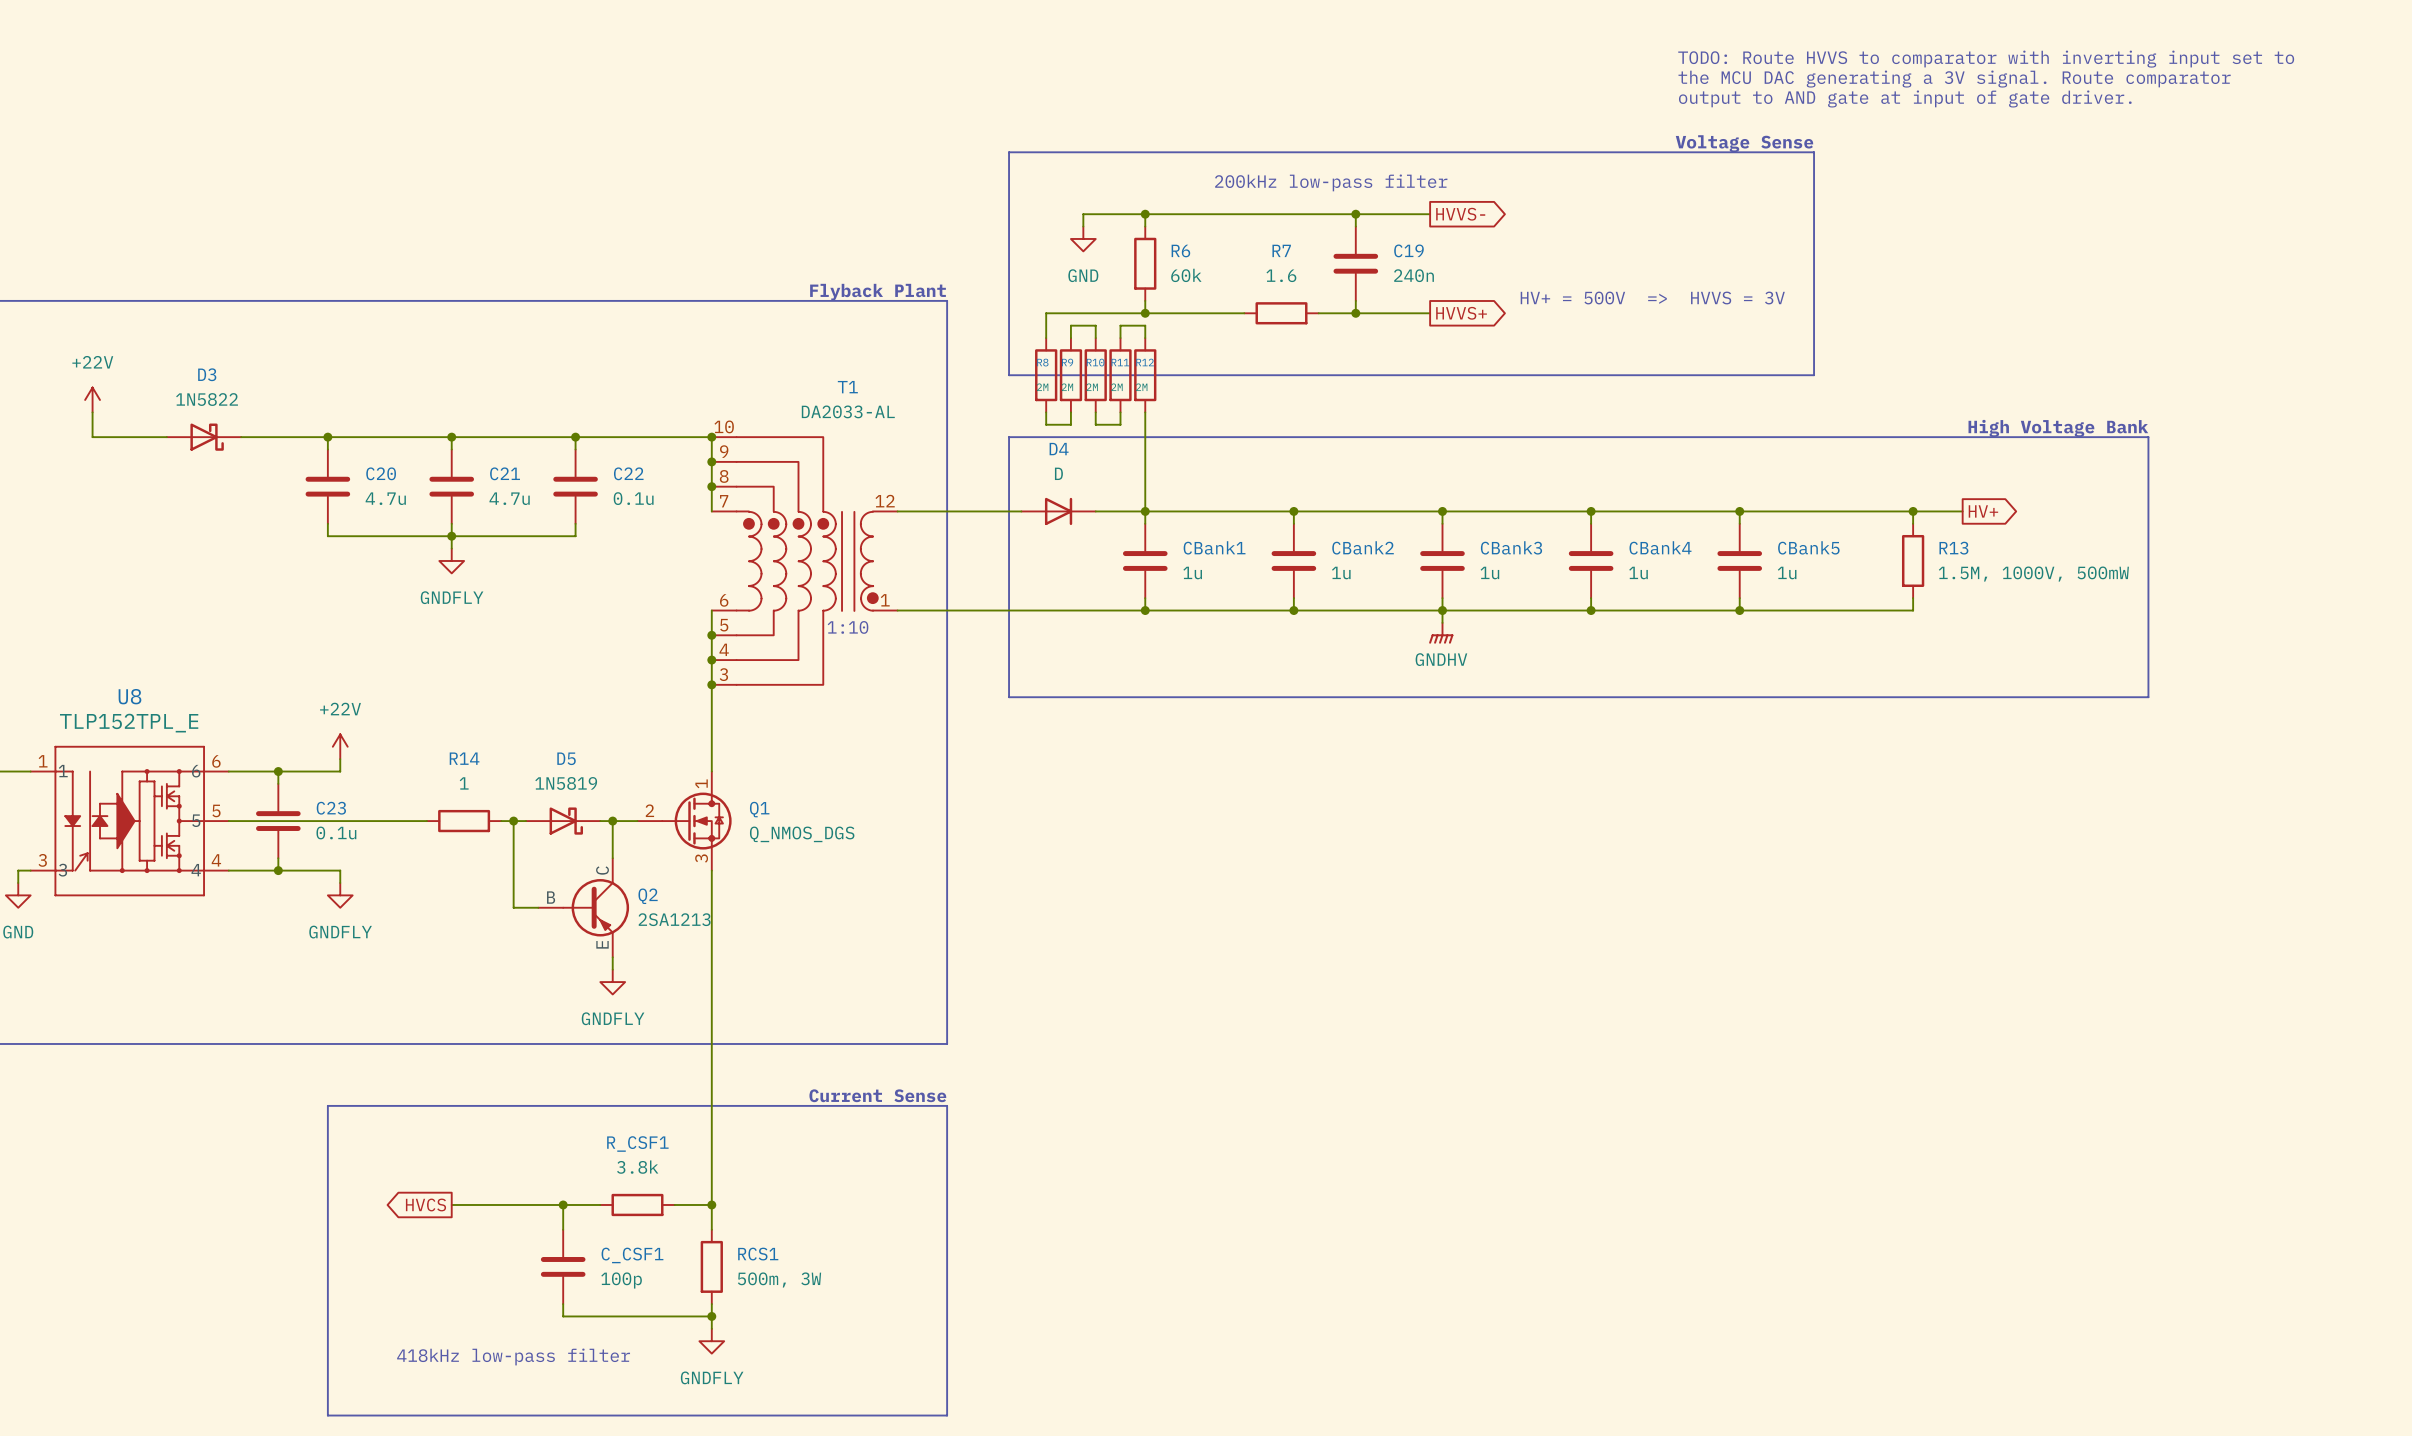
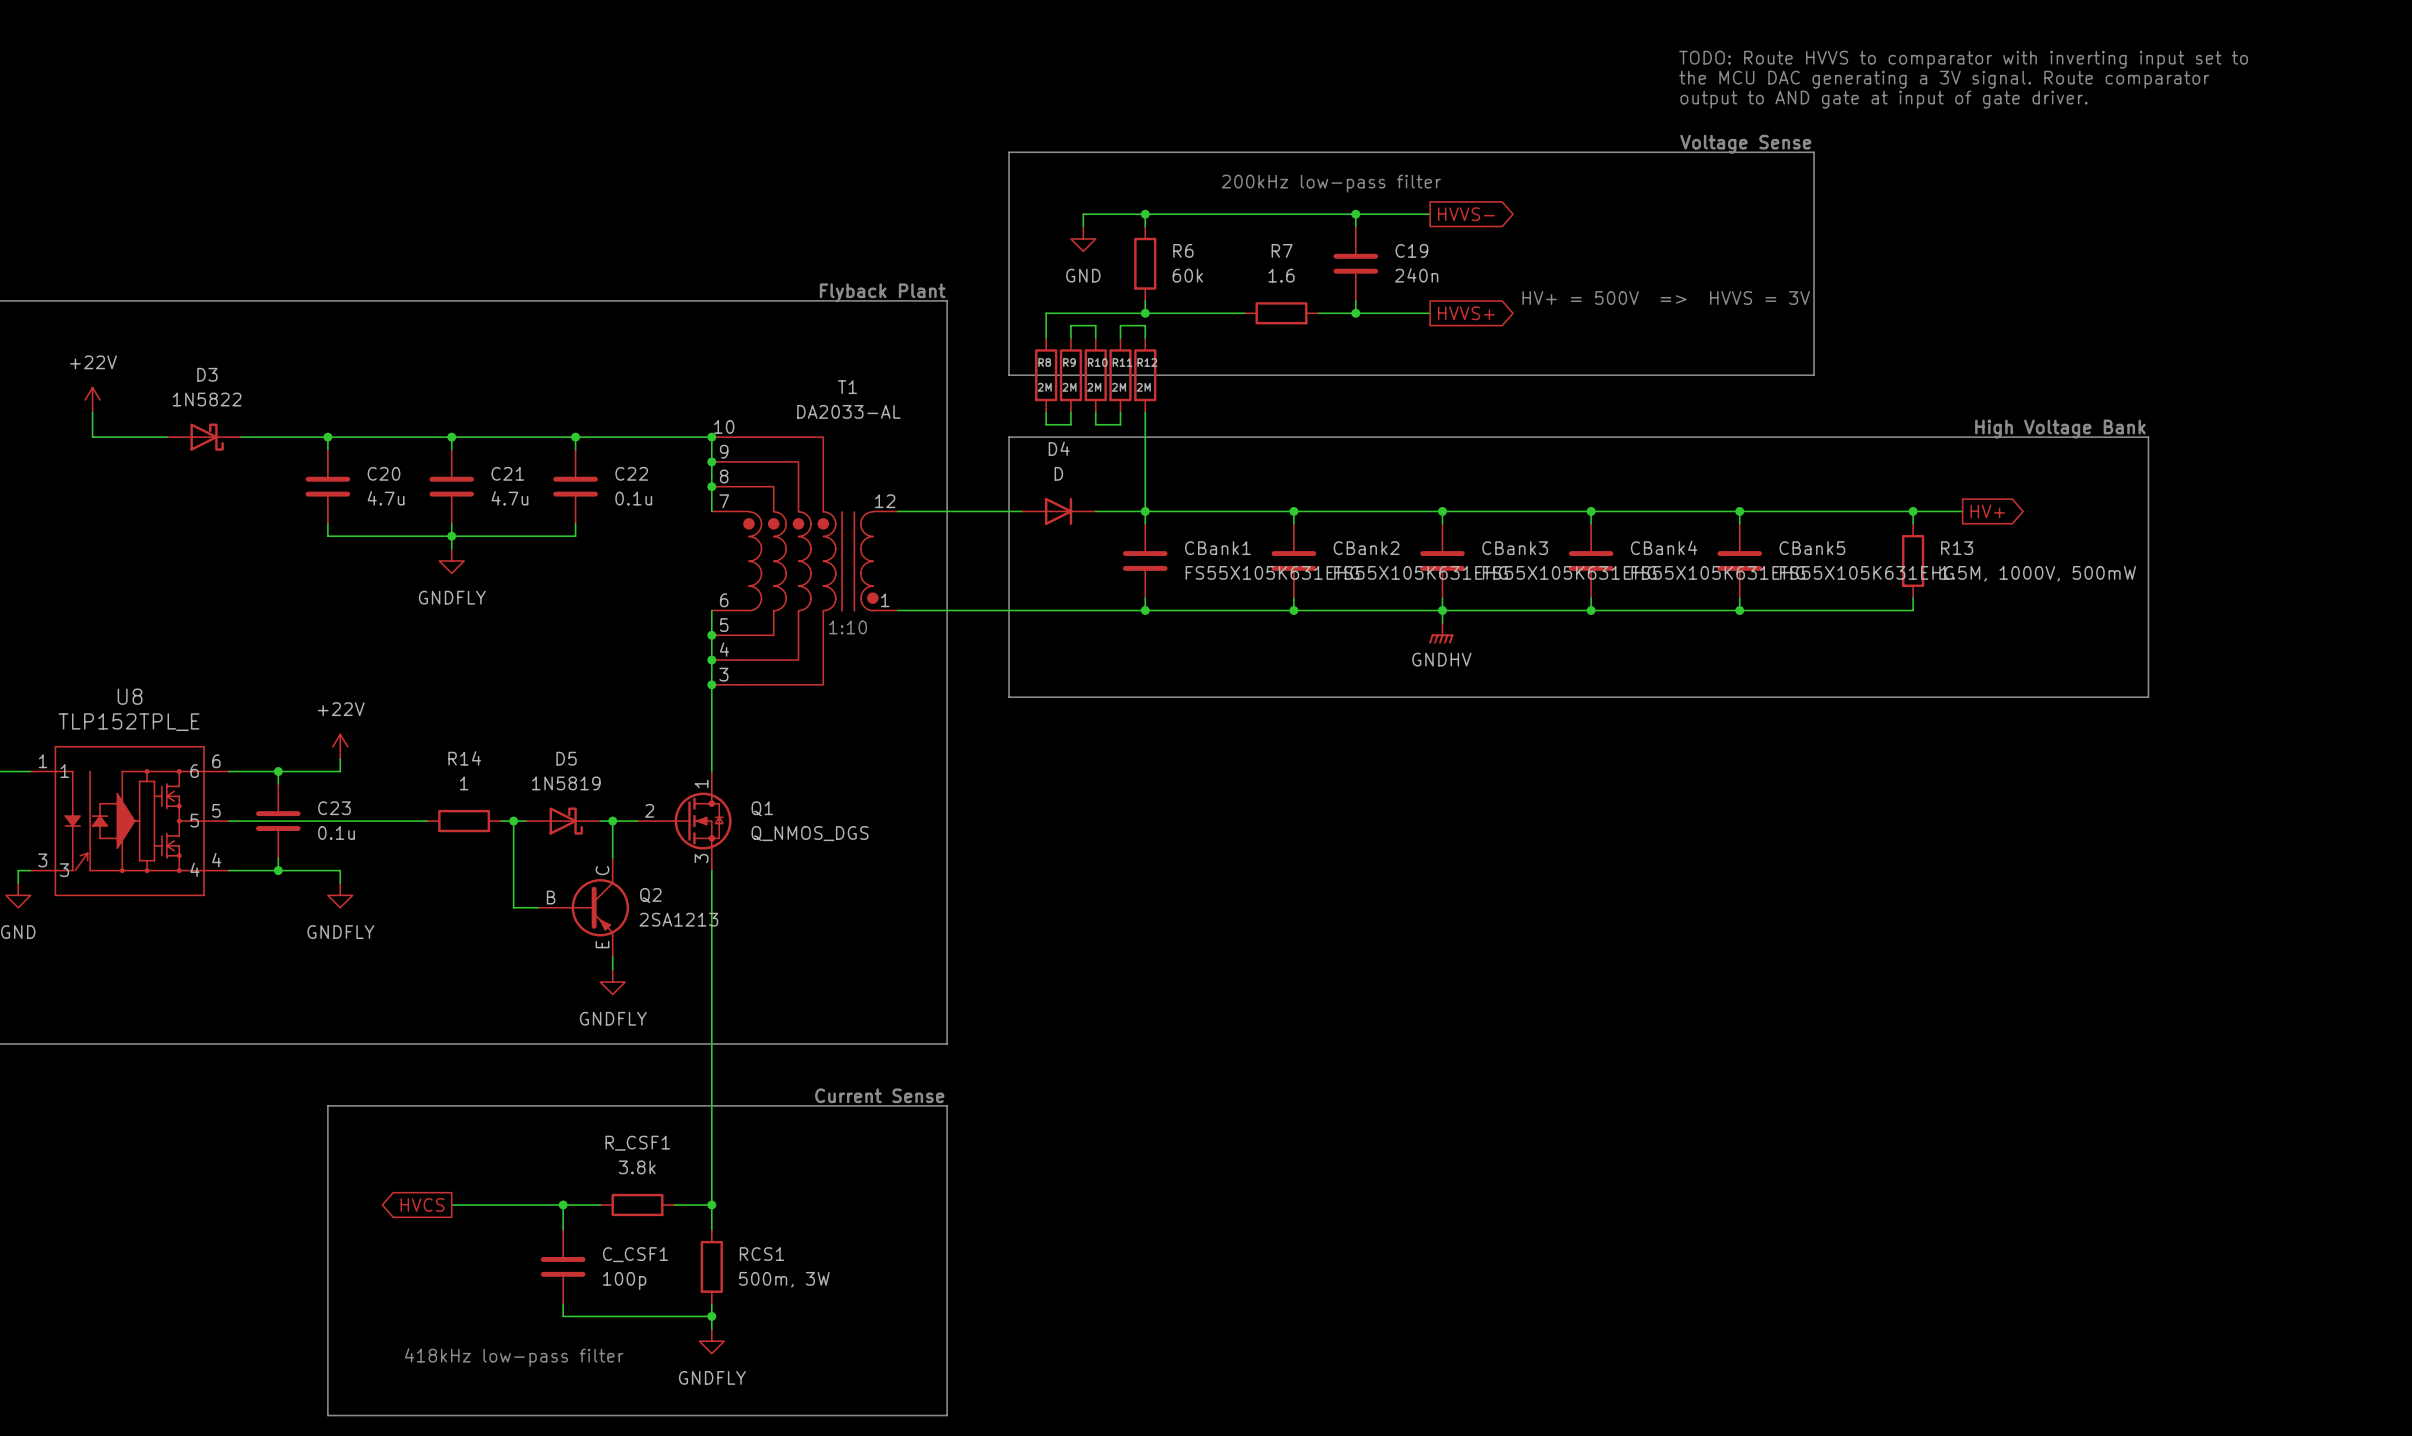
CBank1 value: 1u (1192, 573) -> FS55X105K631EHG (1272, 572)
CBank2 value: 1u (1341, 573) -> FS55X105K631EHG (1421, 572)
CBank3 value: 1u (1489, 573) -> FS55X105K631EHG (1569, 572)
CBank4 value: 1u (1638, 573) -> FS55X105K631EHG (1718, 572)
CBank5 value: 1u (1787, 573) -> FS55X105K631EHG (1866, 572)

